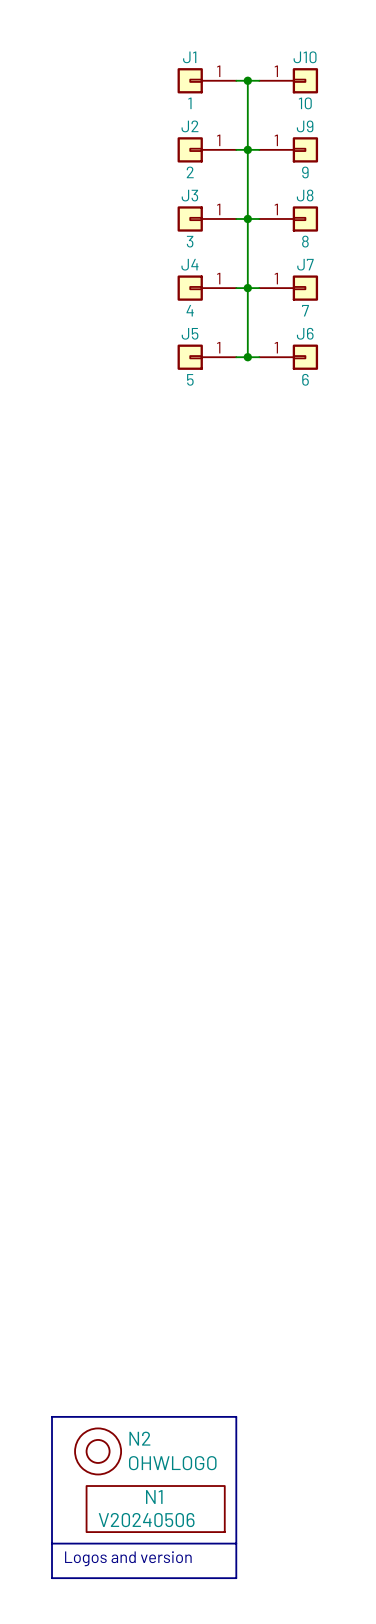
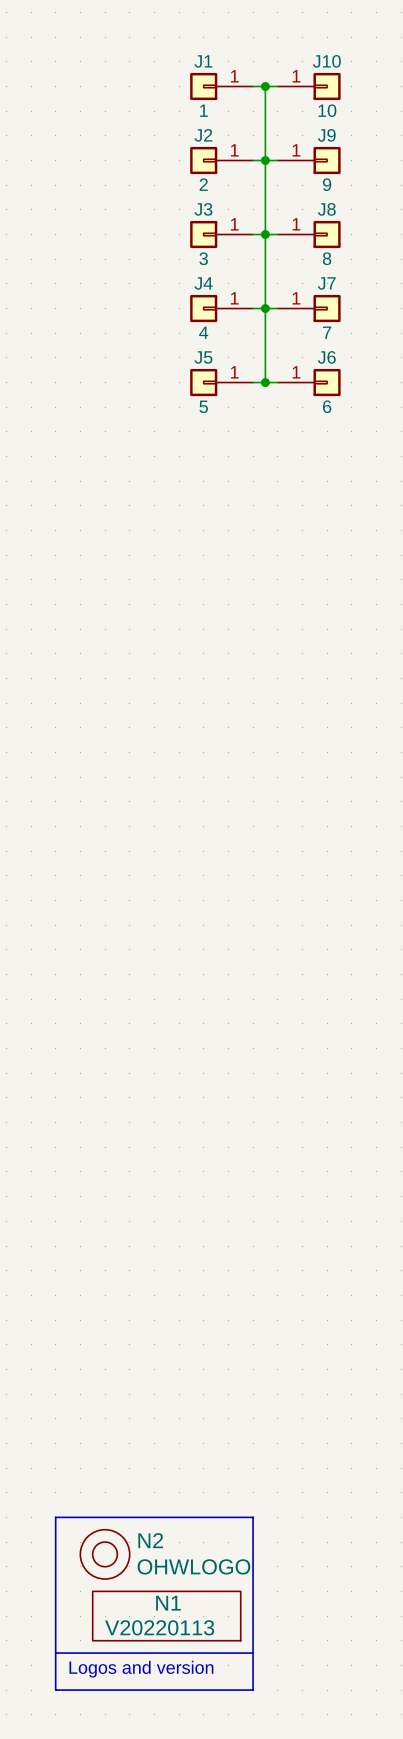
N1 value: V20240506 (146, 1520) -> V20220113 (159, 1627)

